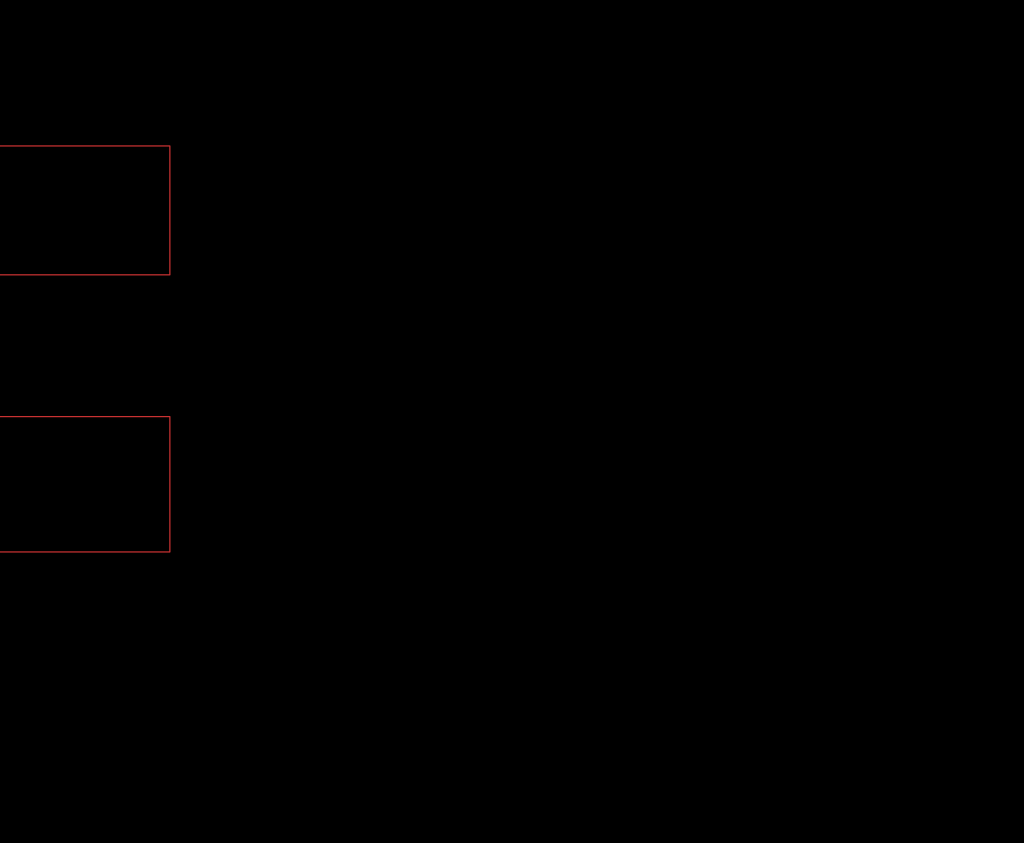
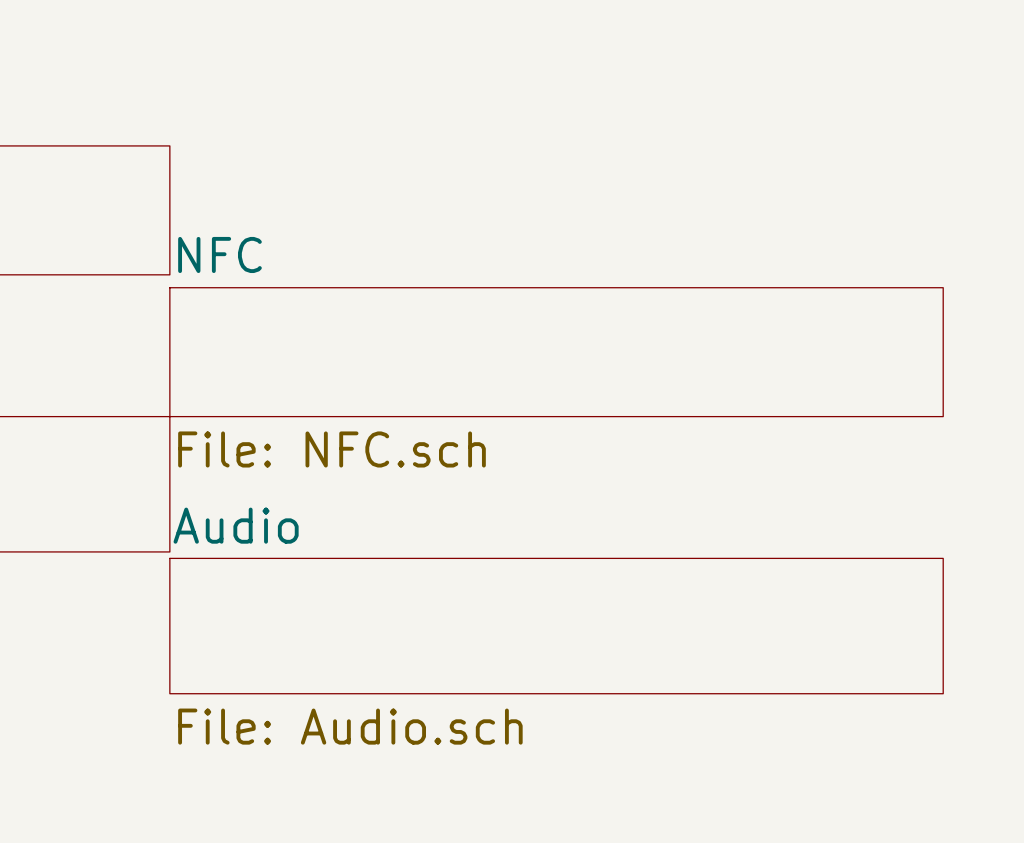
sheet NFC: none -> File: NFC.sch (556, 352)
sheet Audio: none -> File: Audio.sch (556, 626)

